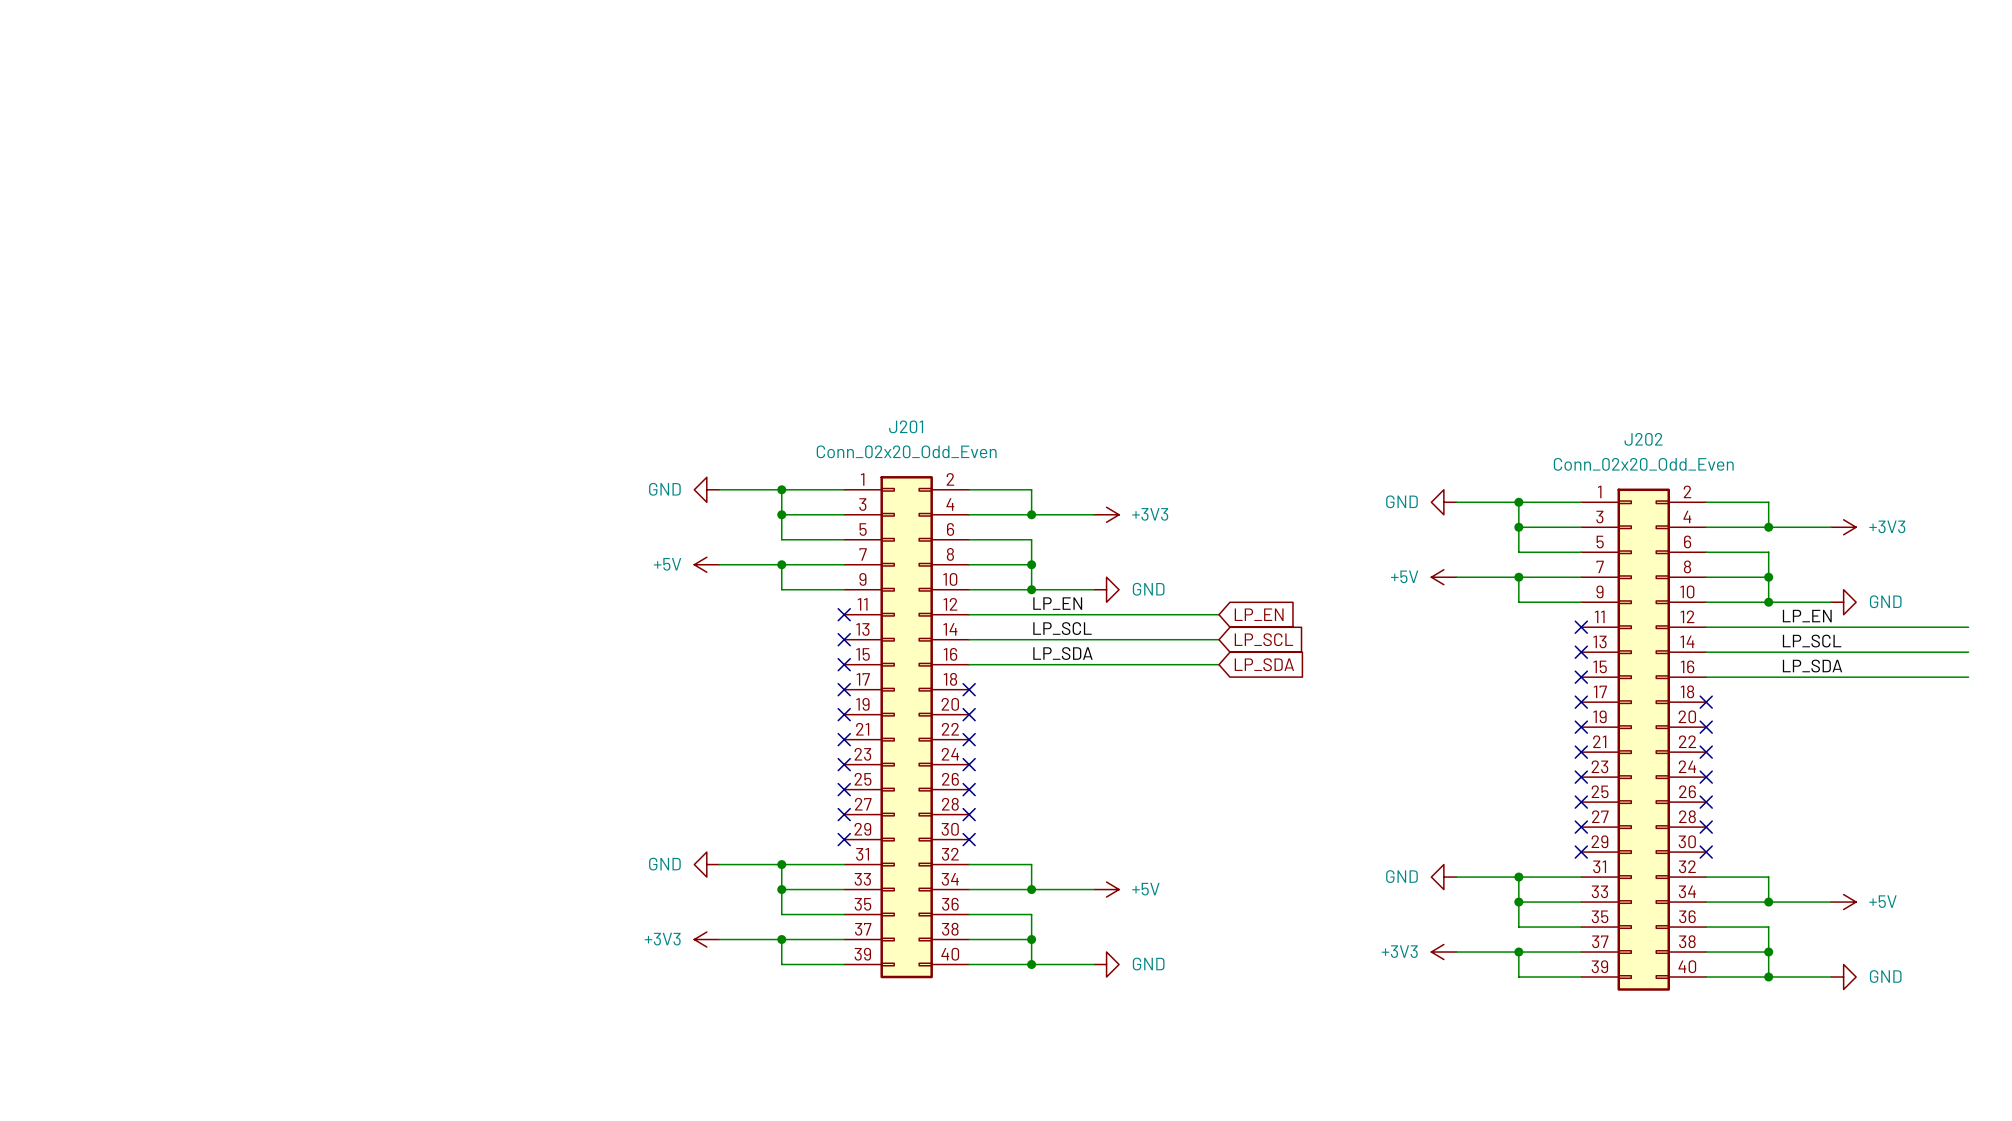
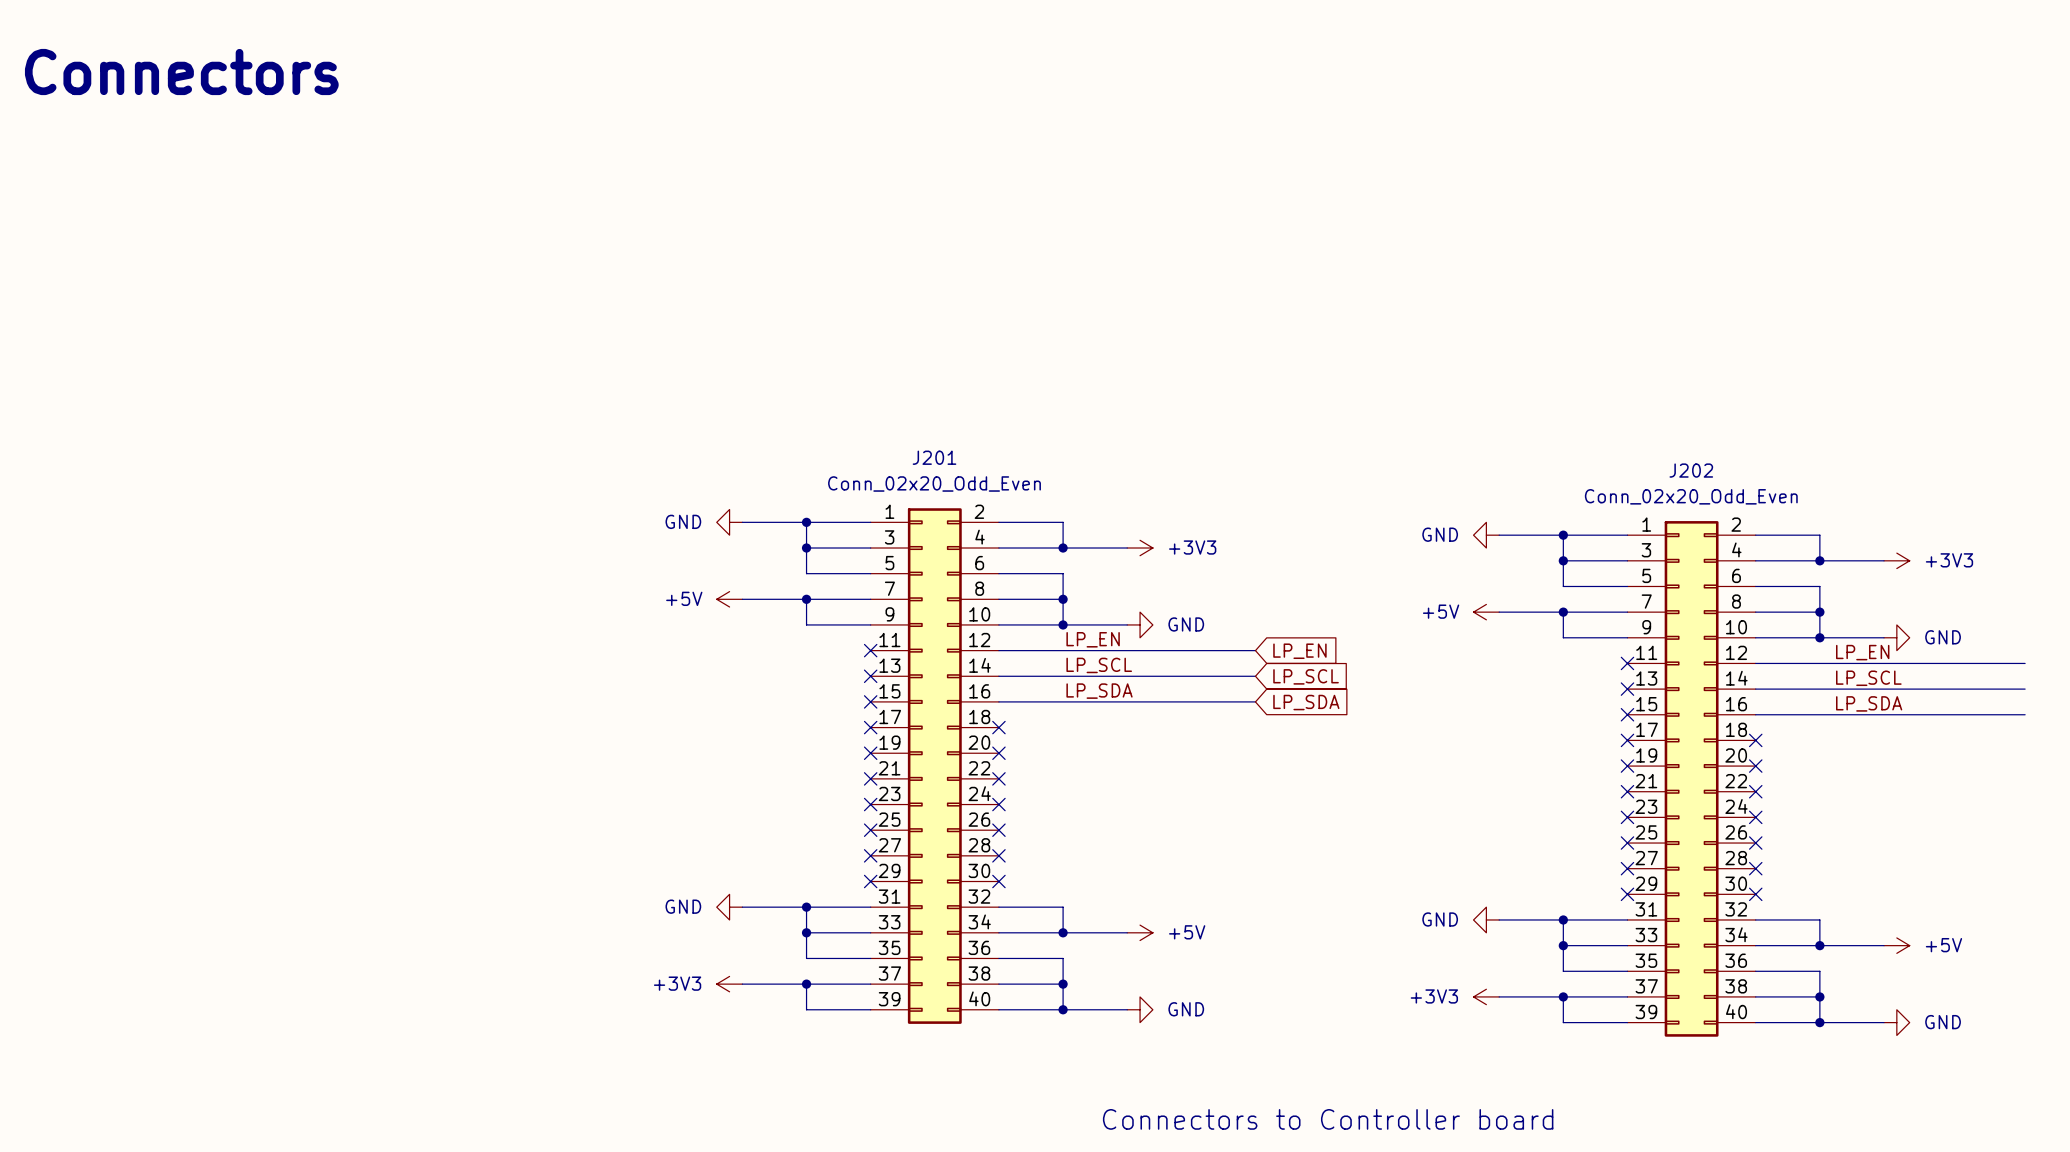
text: none -> Connectors (181, 72)
text: none -> Connectors to Controller board (1328, 1119)

